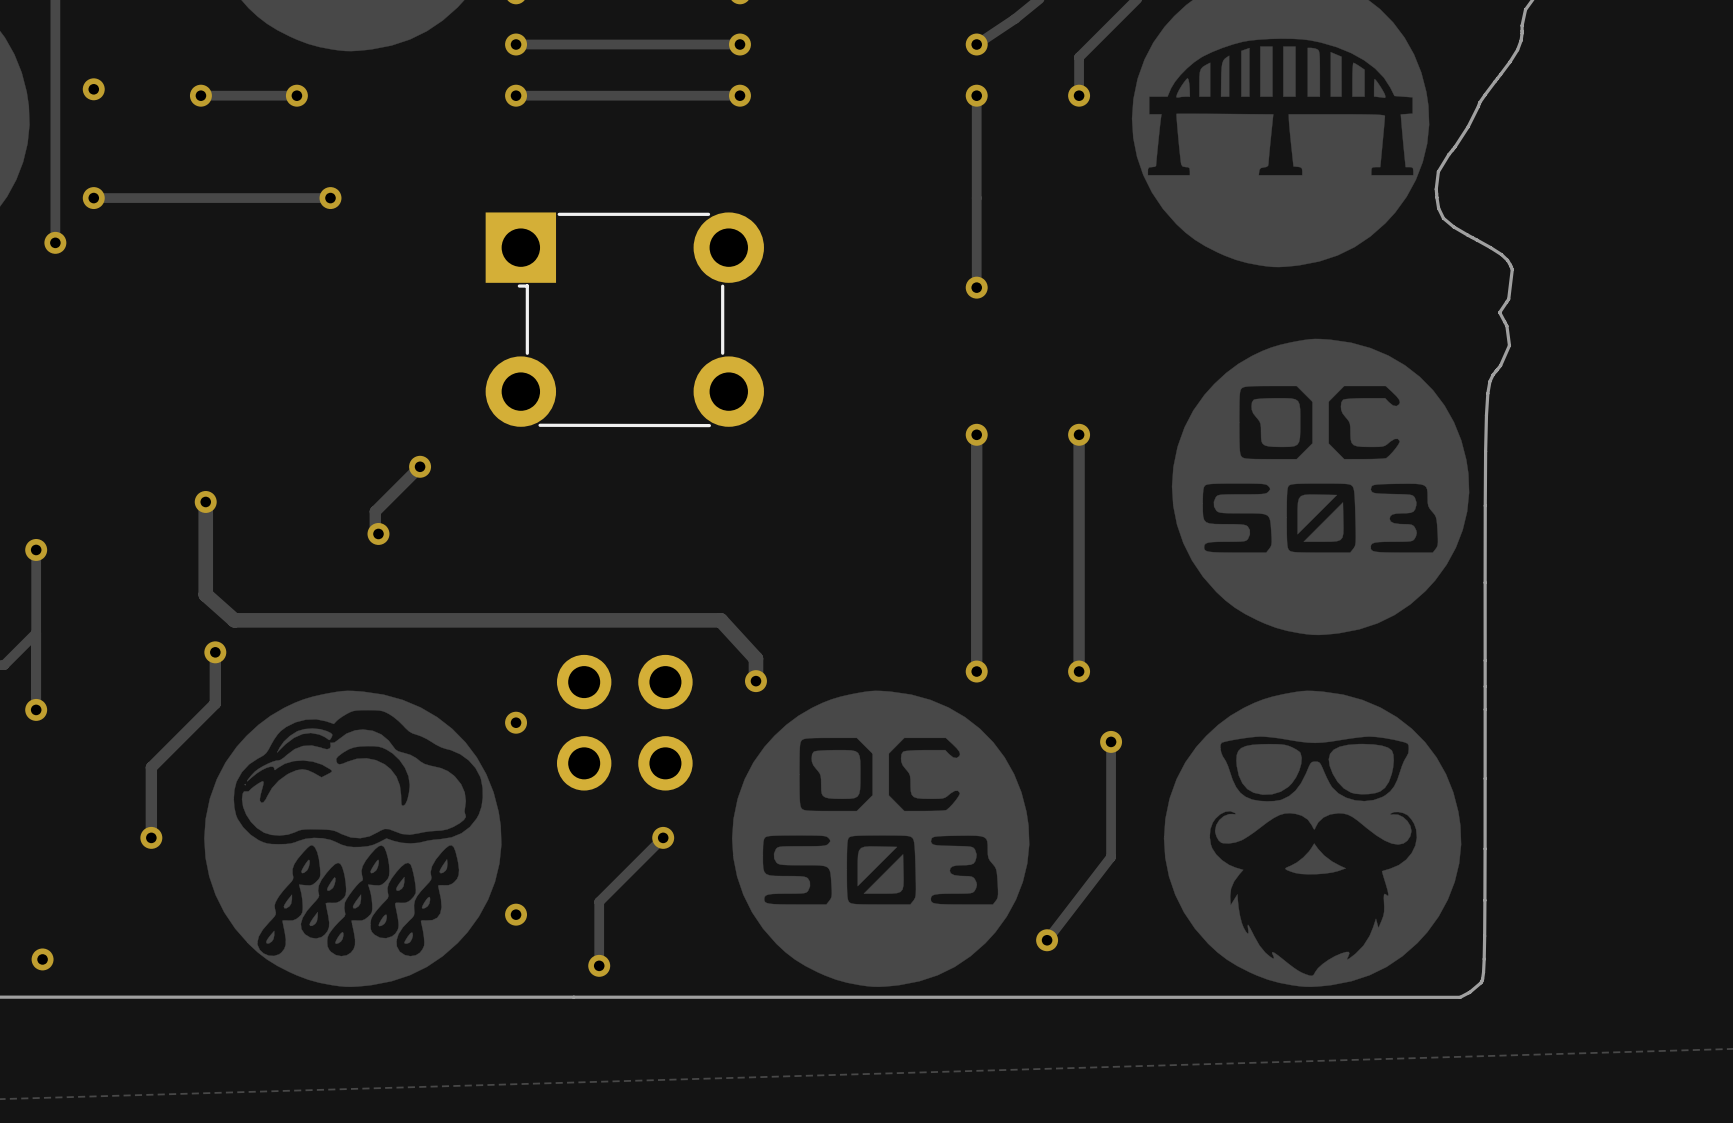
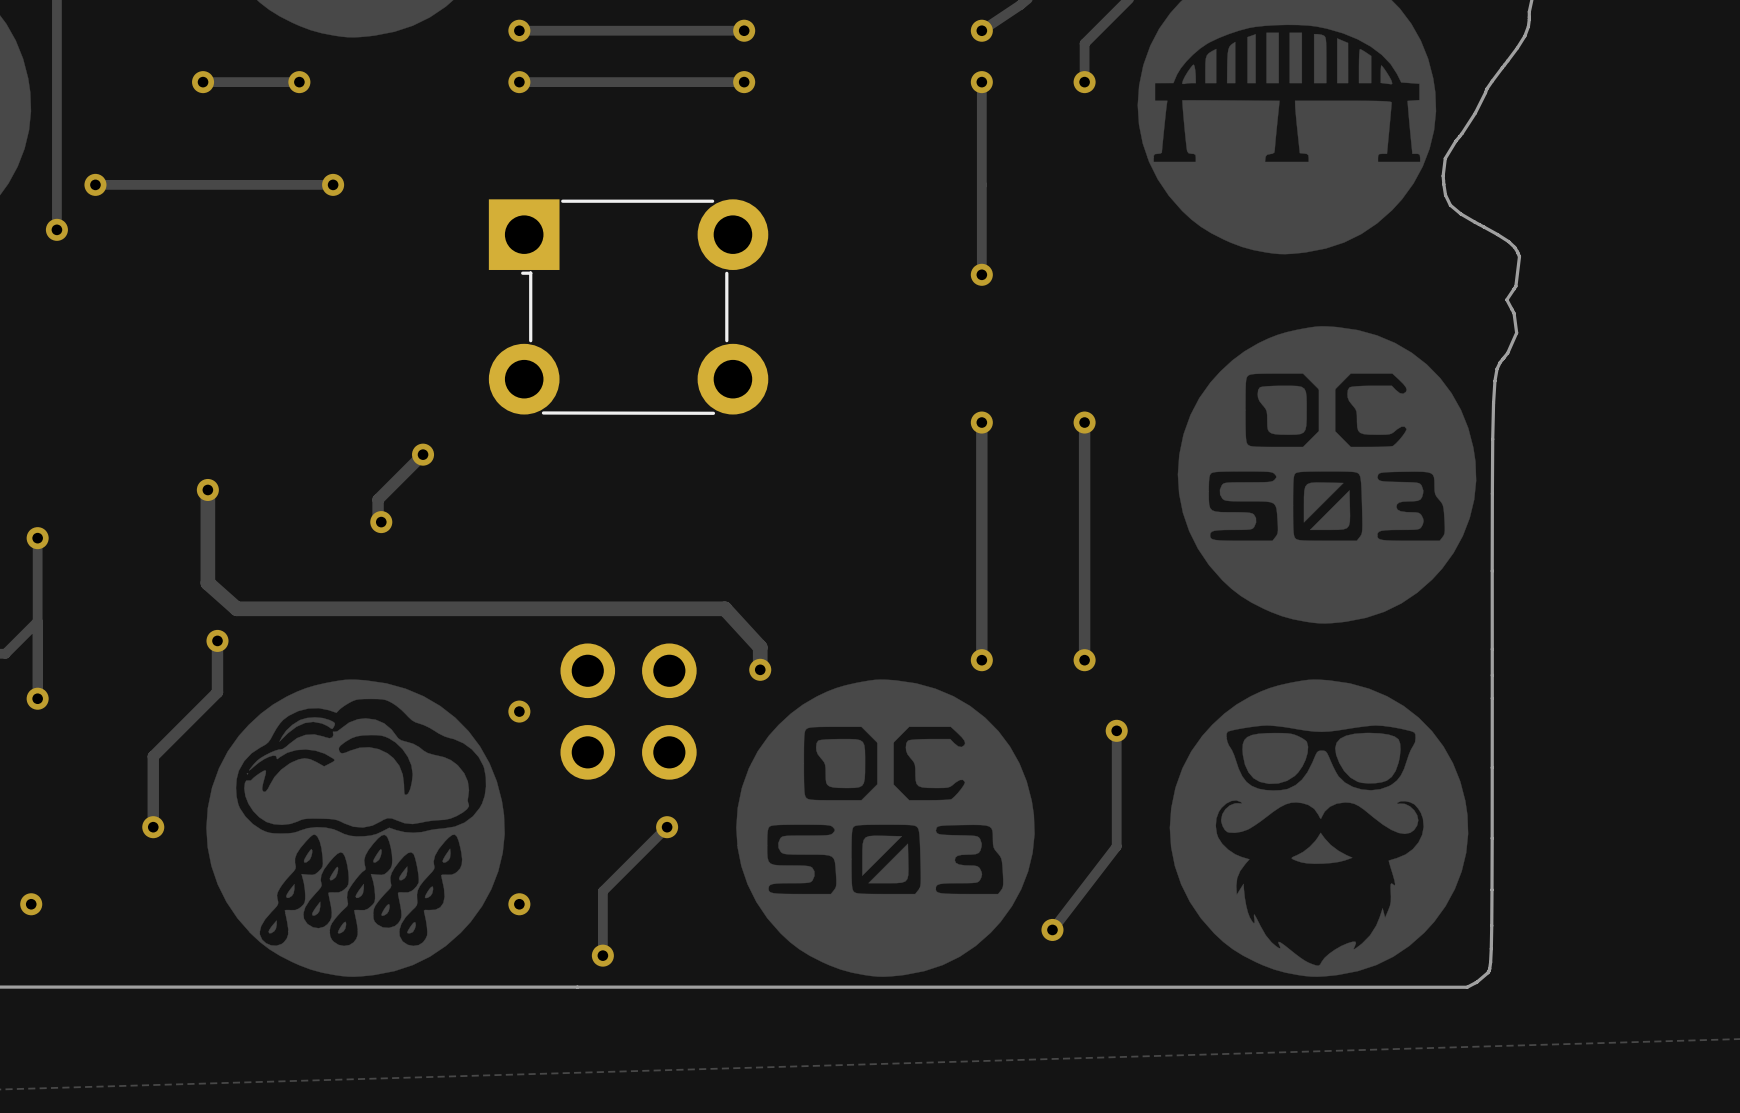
via: (93, 89) -> none
via position: (42, 959) -> (31, 904)

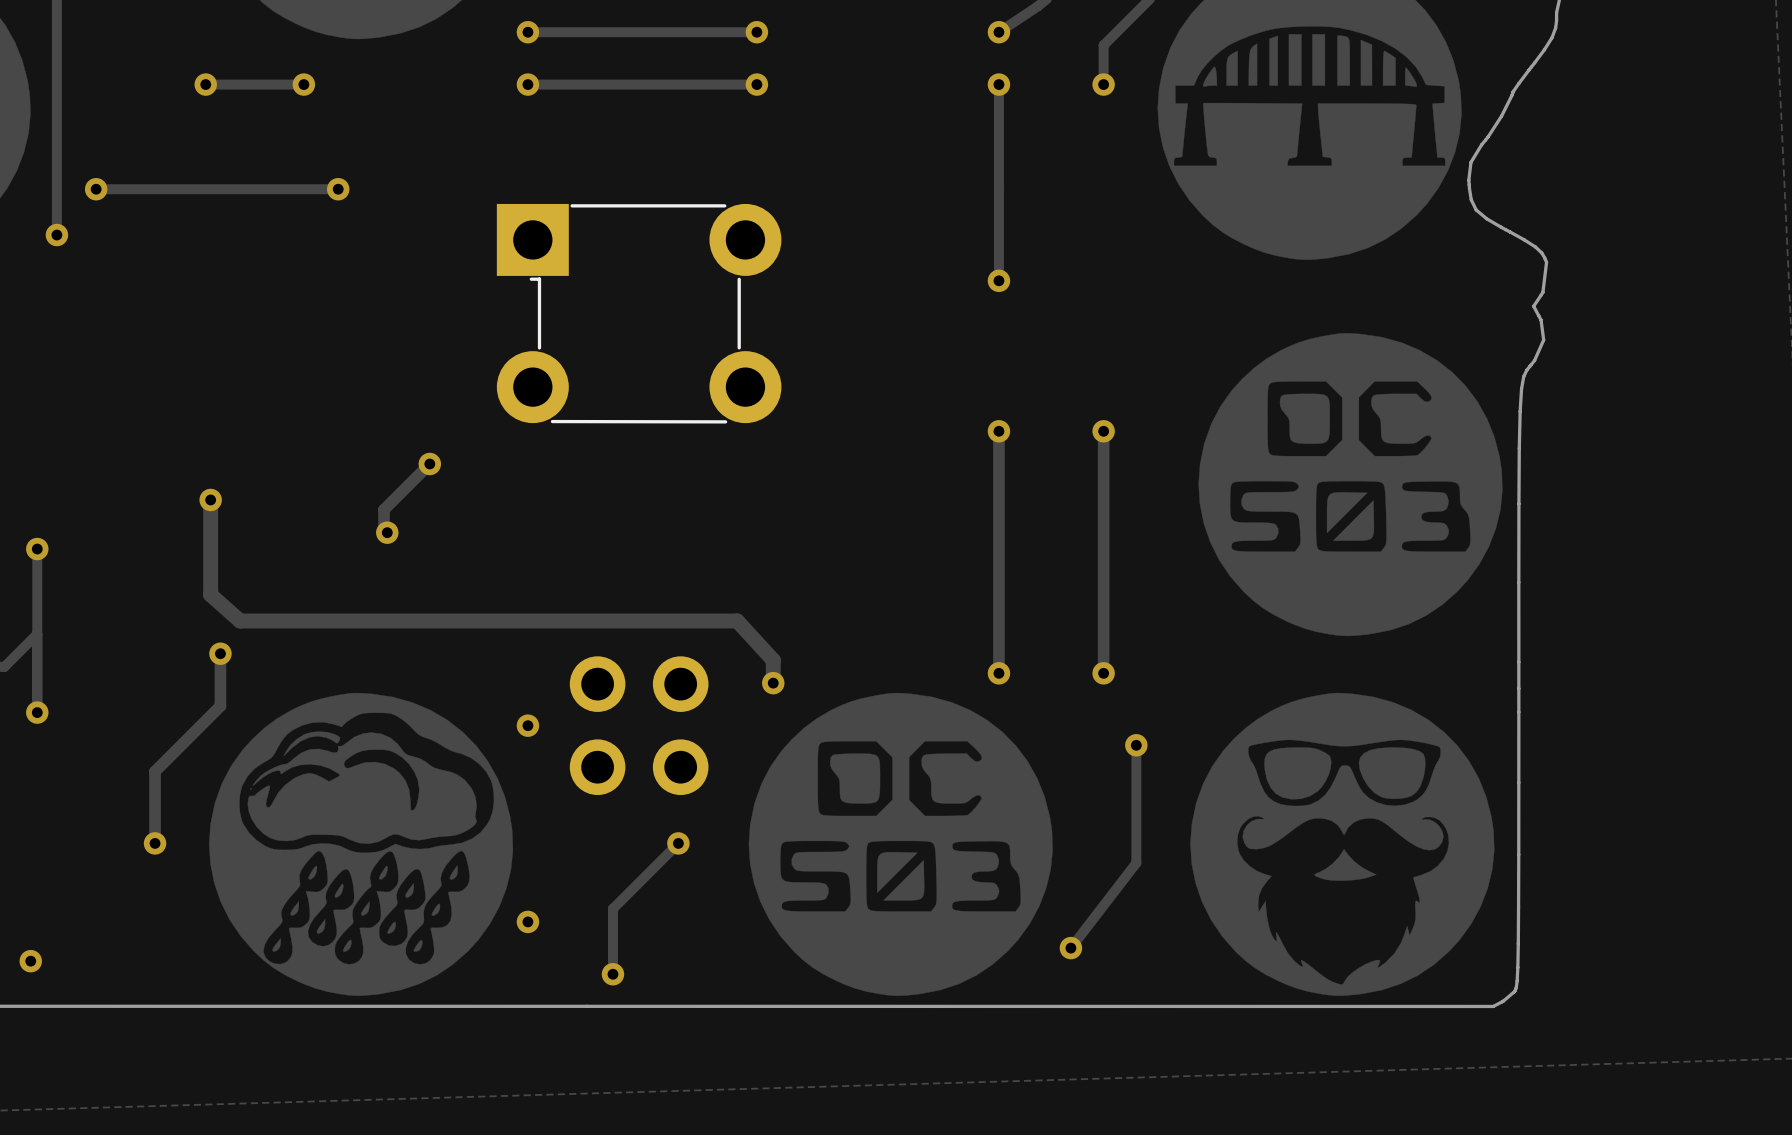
via position: (31, 904) -> (30, 961)

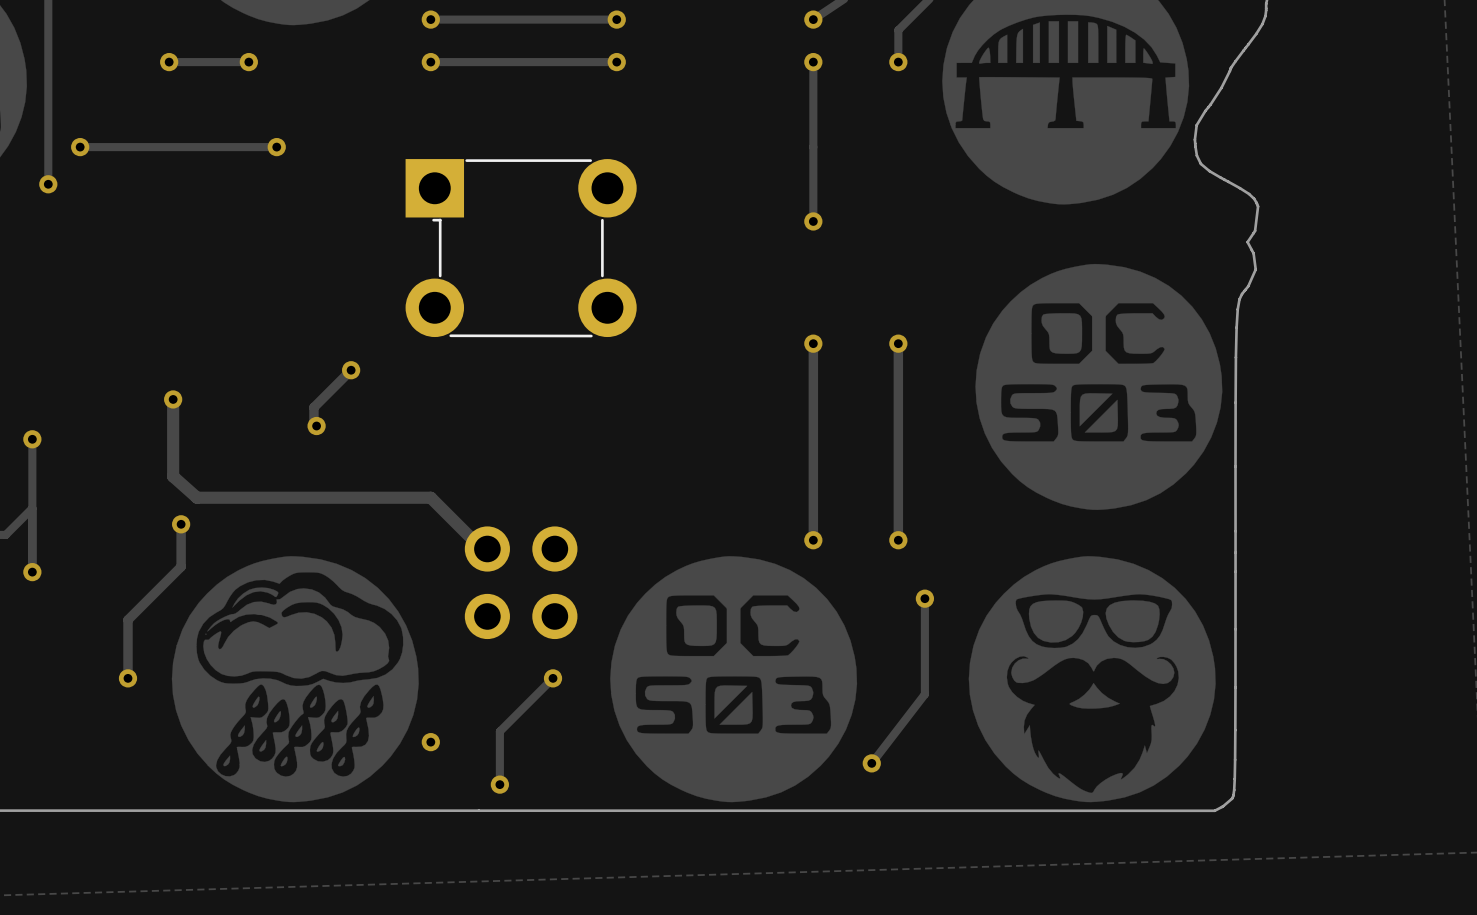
track: (527, 620) (737, 620) (773, 660) (773, 683) -> (430, 497) (482, 549) (487, 549)
via: (773, 683) -> none
via: (527, 725) -> none
via: (30, 961) -> none

